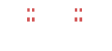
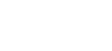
part: (30, 9) -> none
part: (78, 9) -> none
part: (30, 19) -> none
part: (78, 19) -> none

